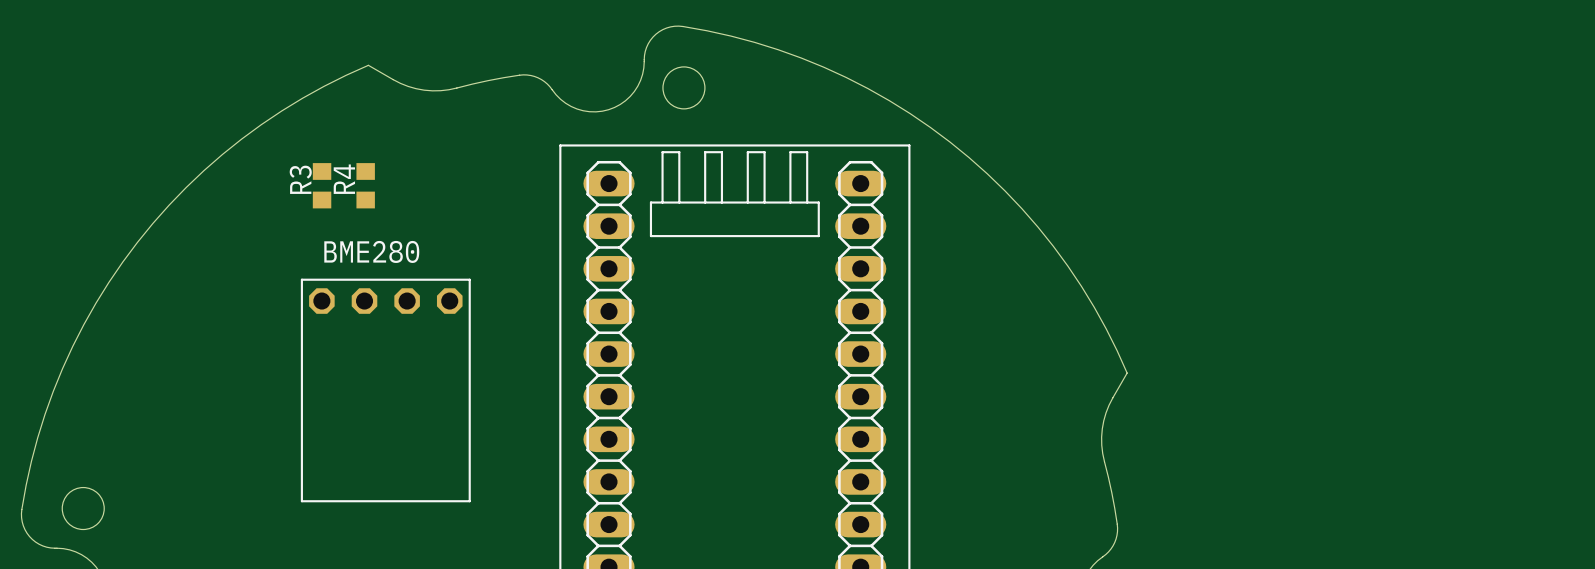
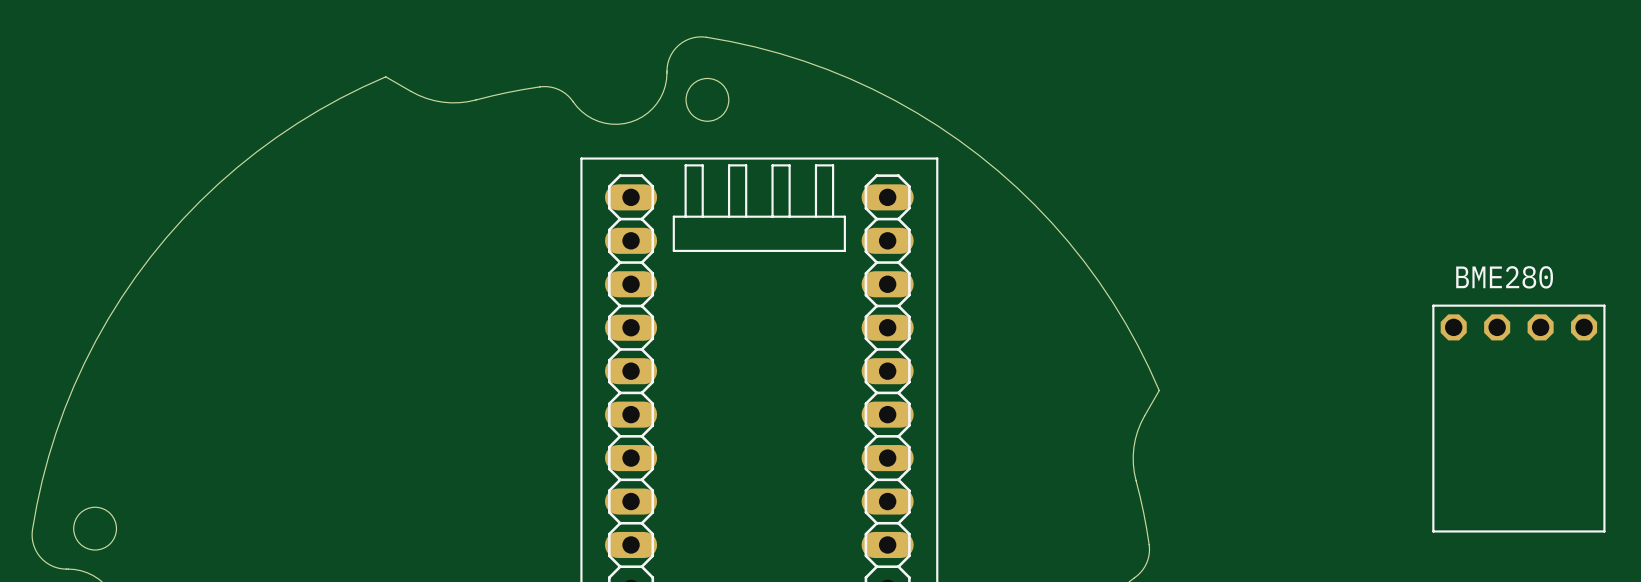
R3: (322, 185) -> none
R4: (365, 185) -> none
BME280 position: (385, 390) -> (1518, 418)

